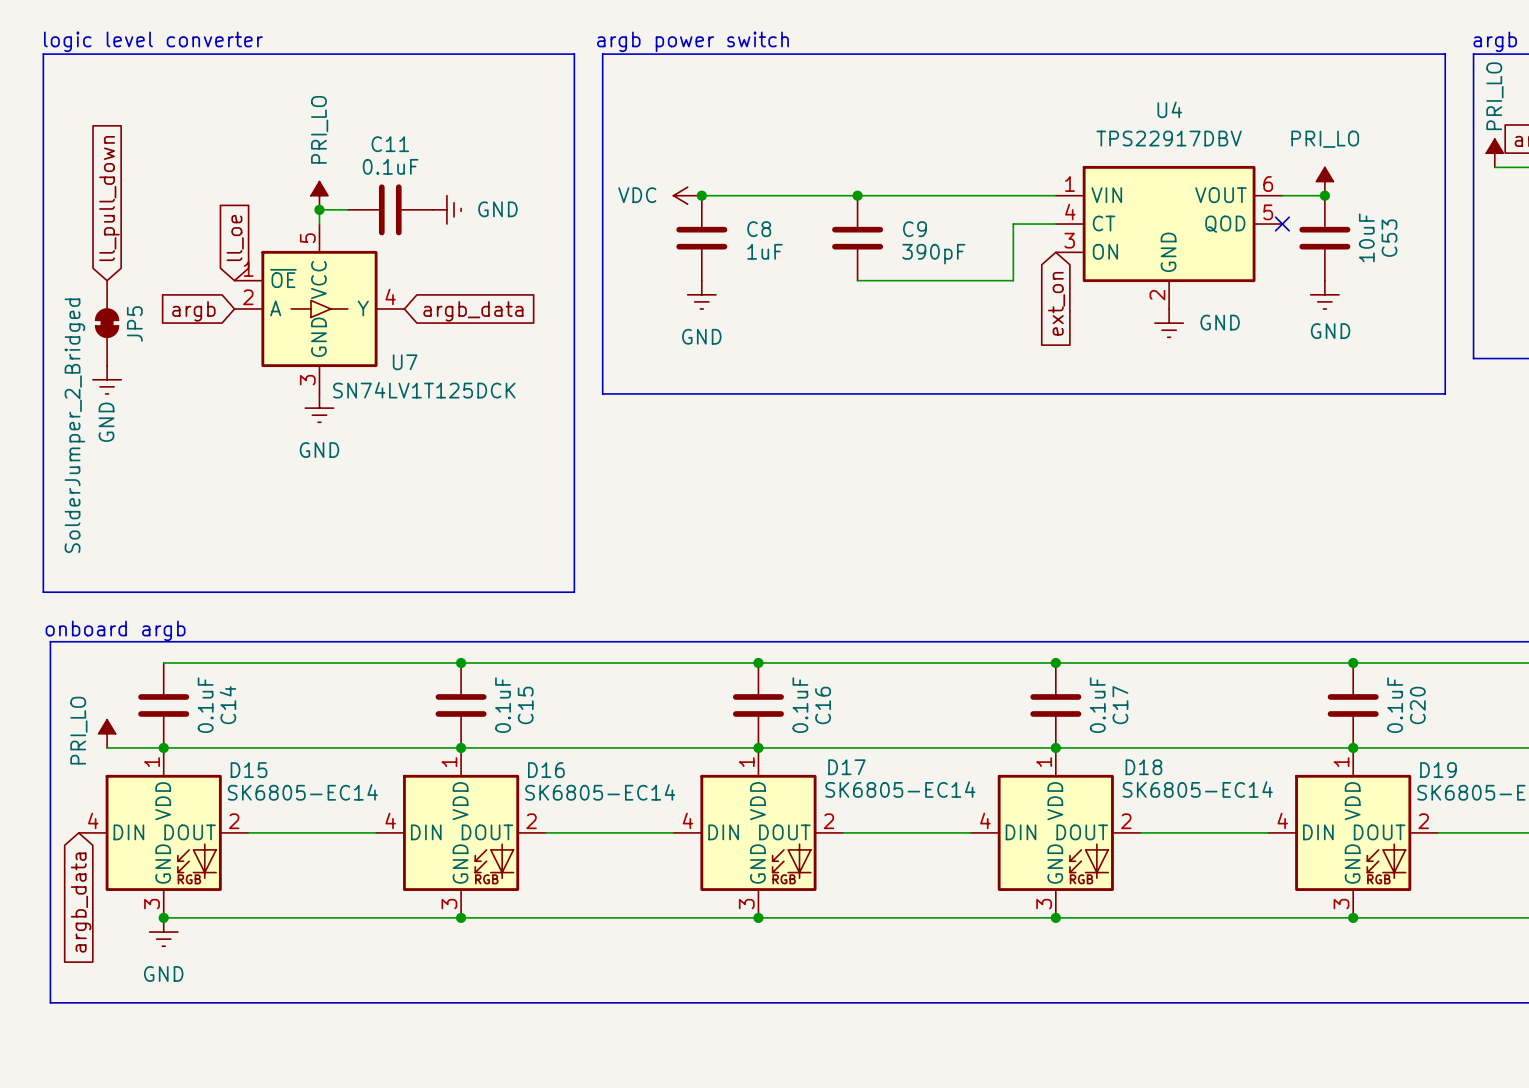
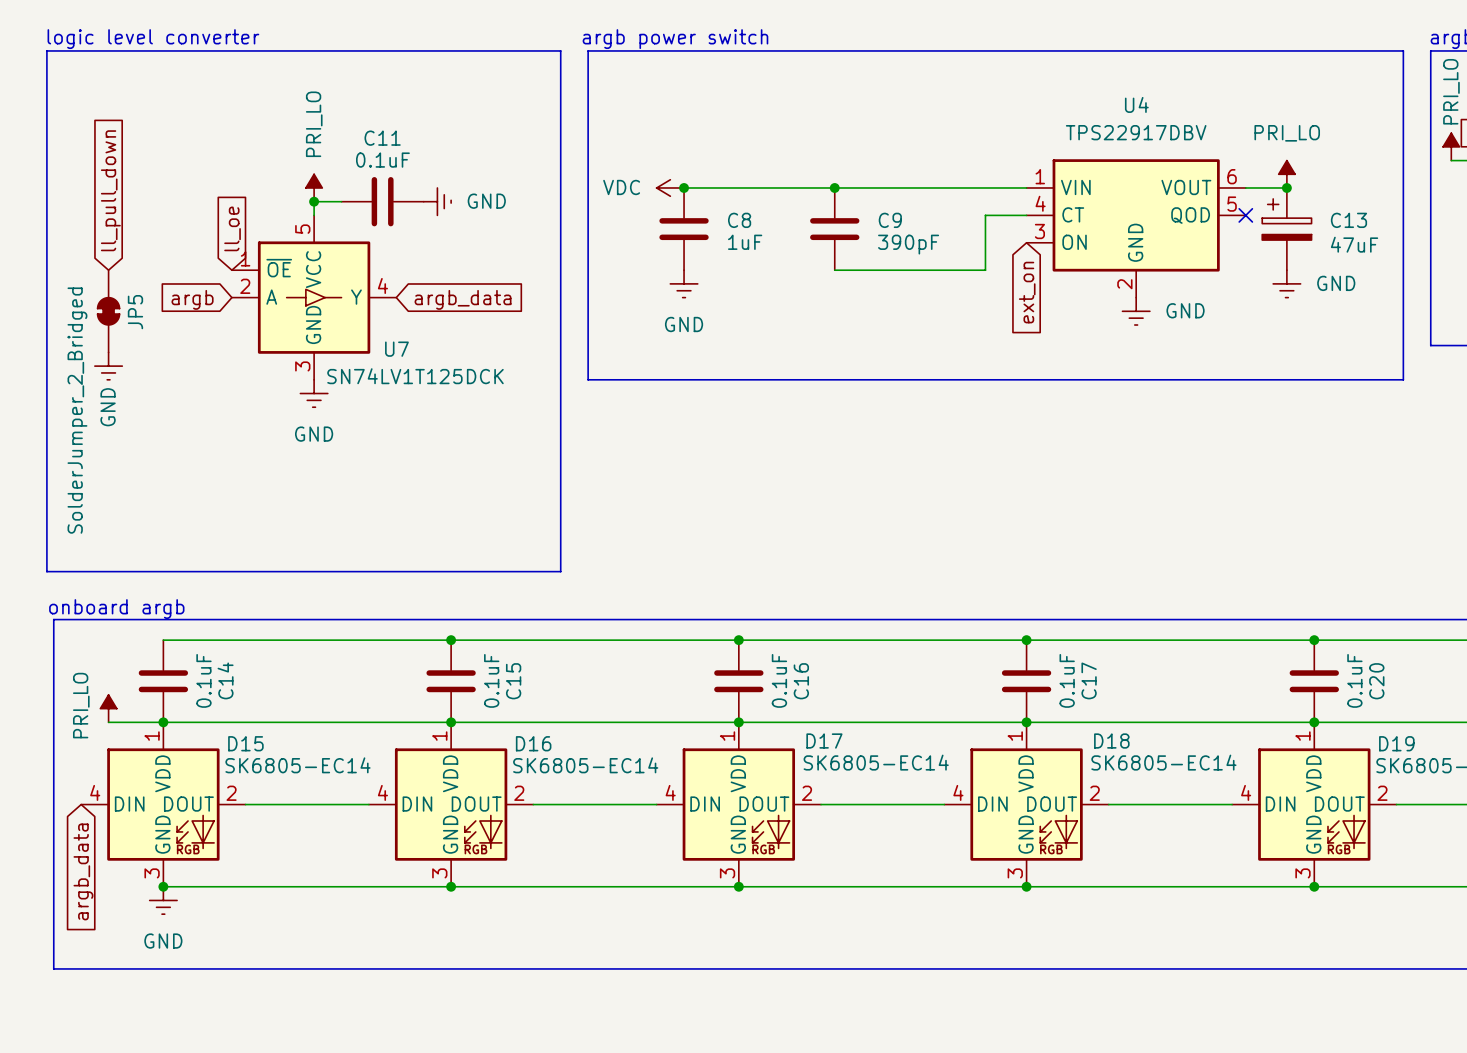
C53: 10uF (1324, 238) -> none
C13: none -> 47uF (1286, 229)
power symbol text position: GND (1330, 331) -> GND (1336, 283)

